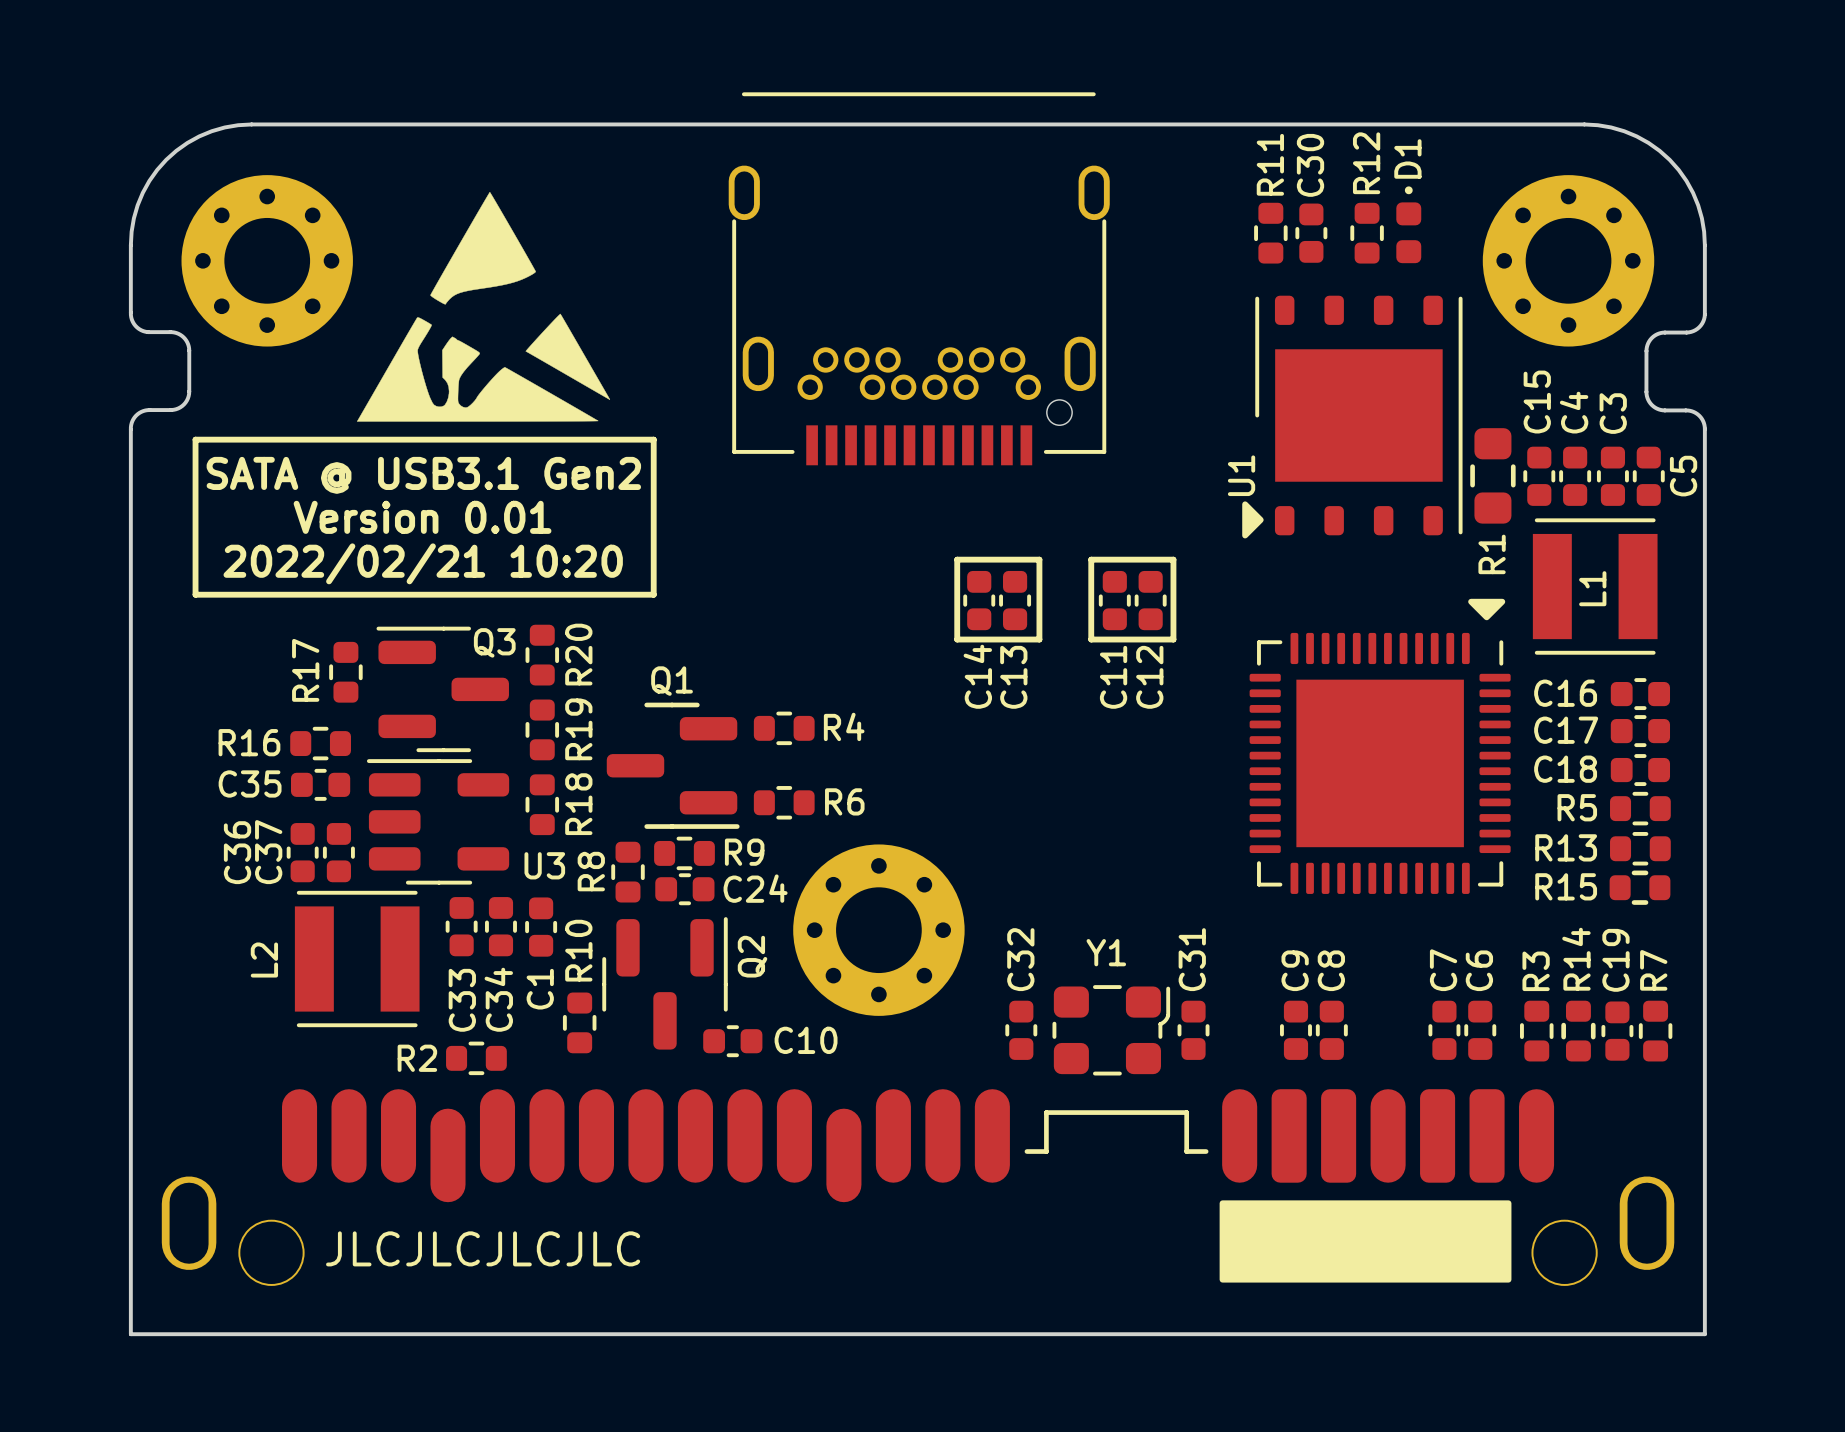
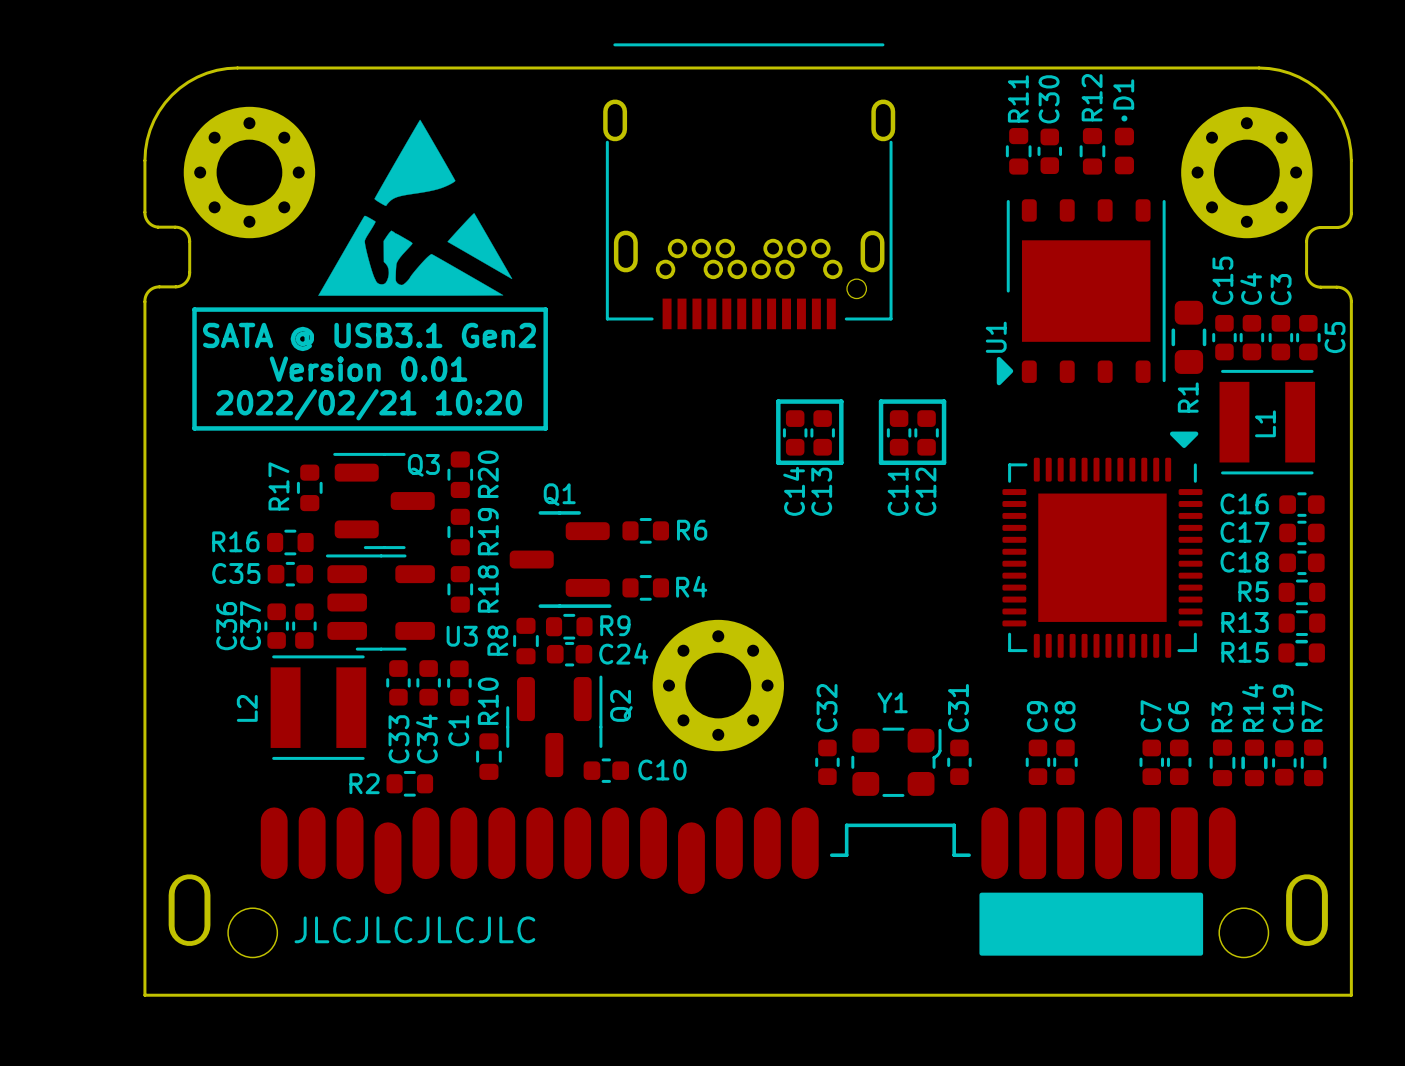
R4 name: R4 (844, 726) -> R6 (692, 530)
R6 name: R6 (844, 801) -> R4 (691, 586)

